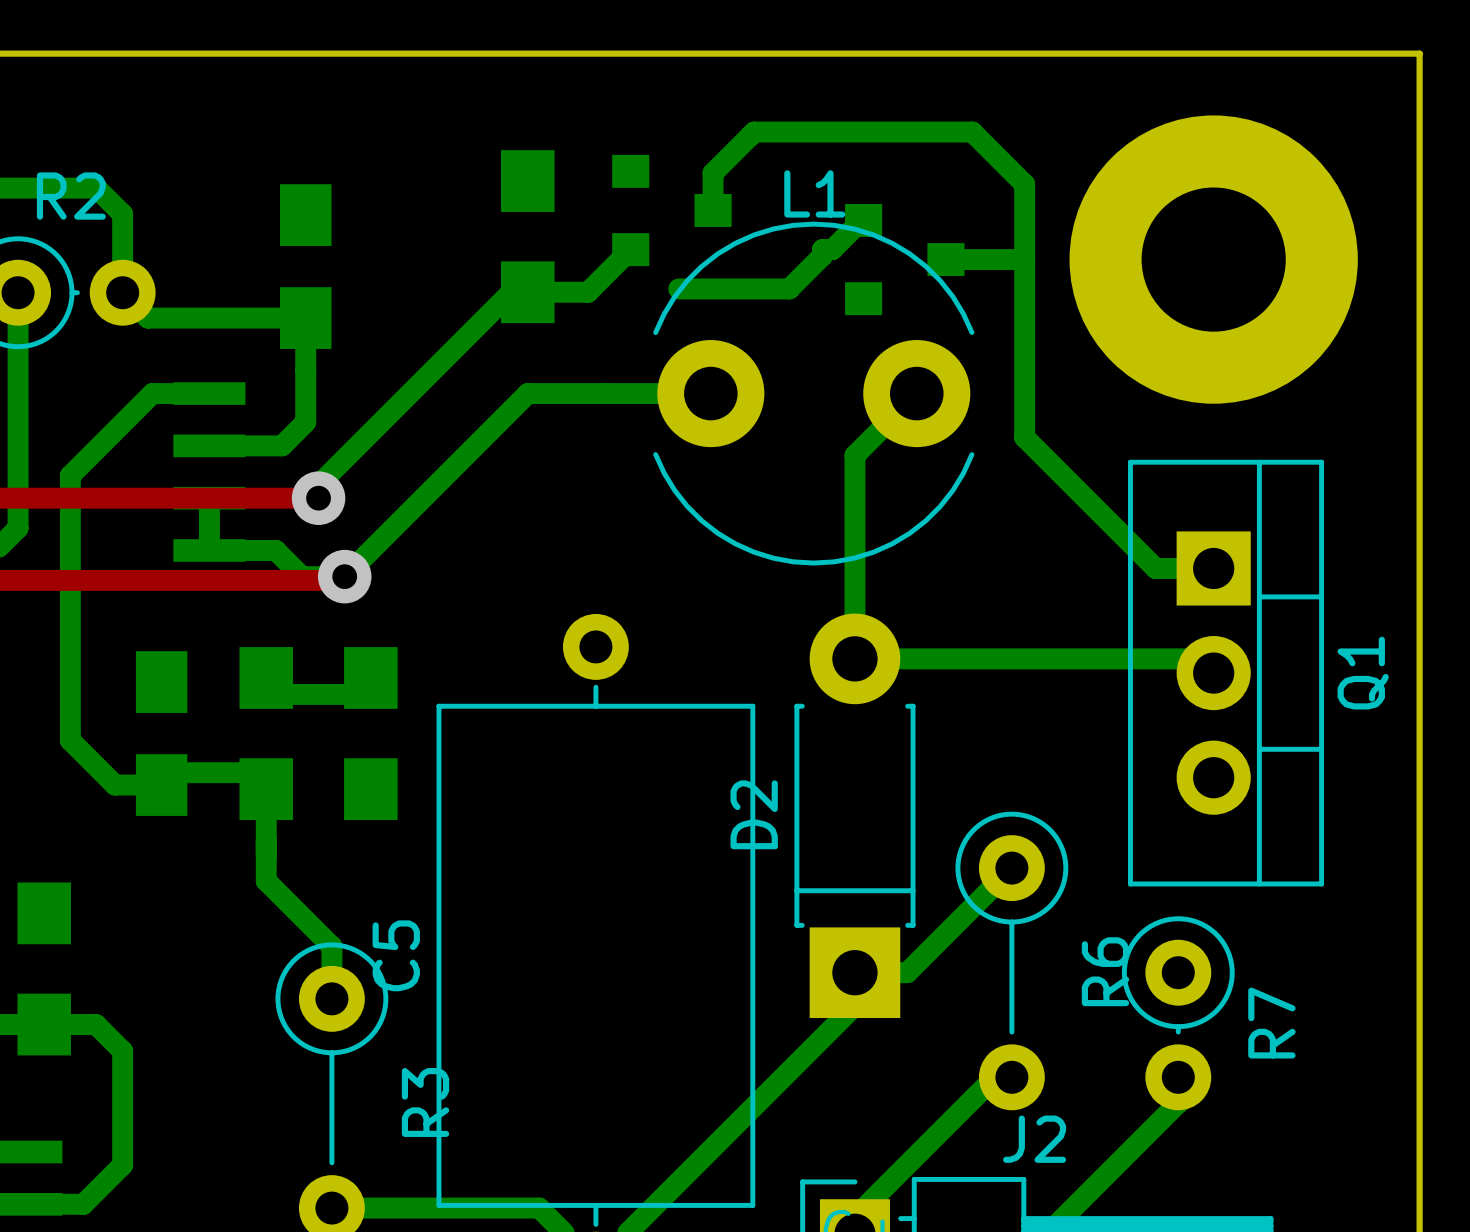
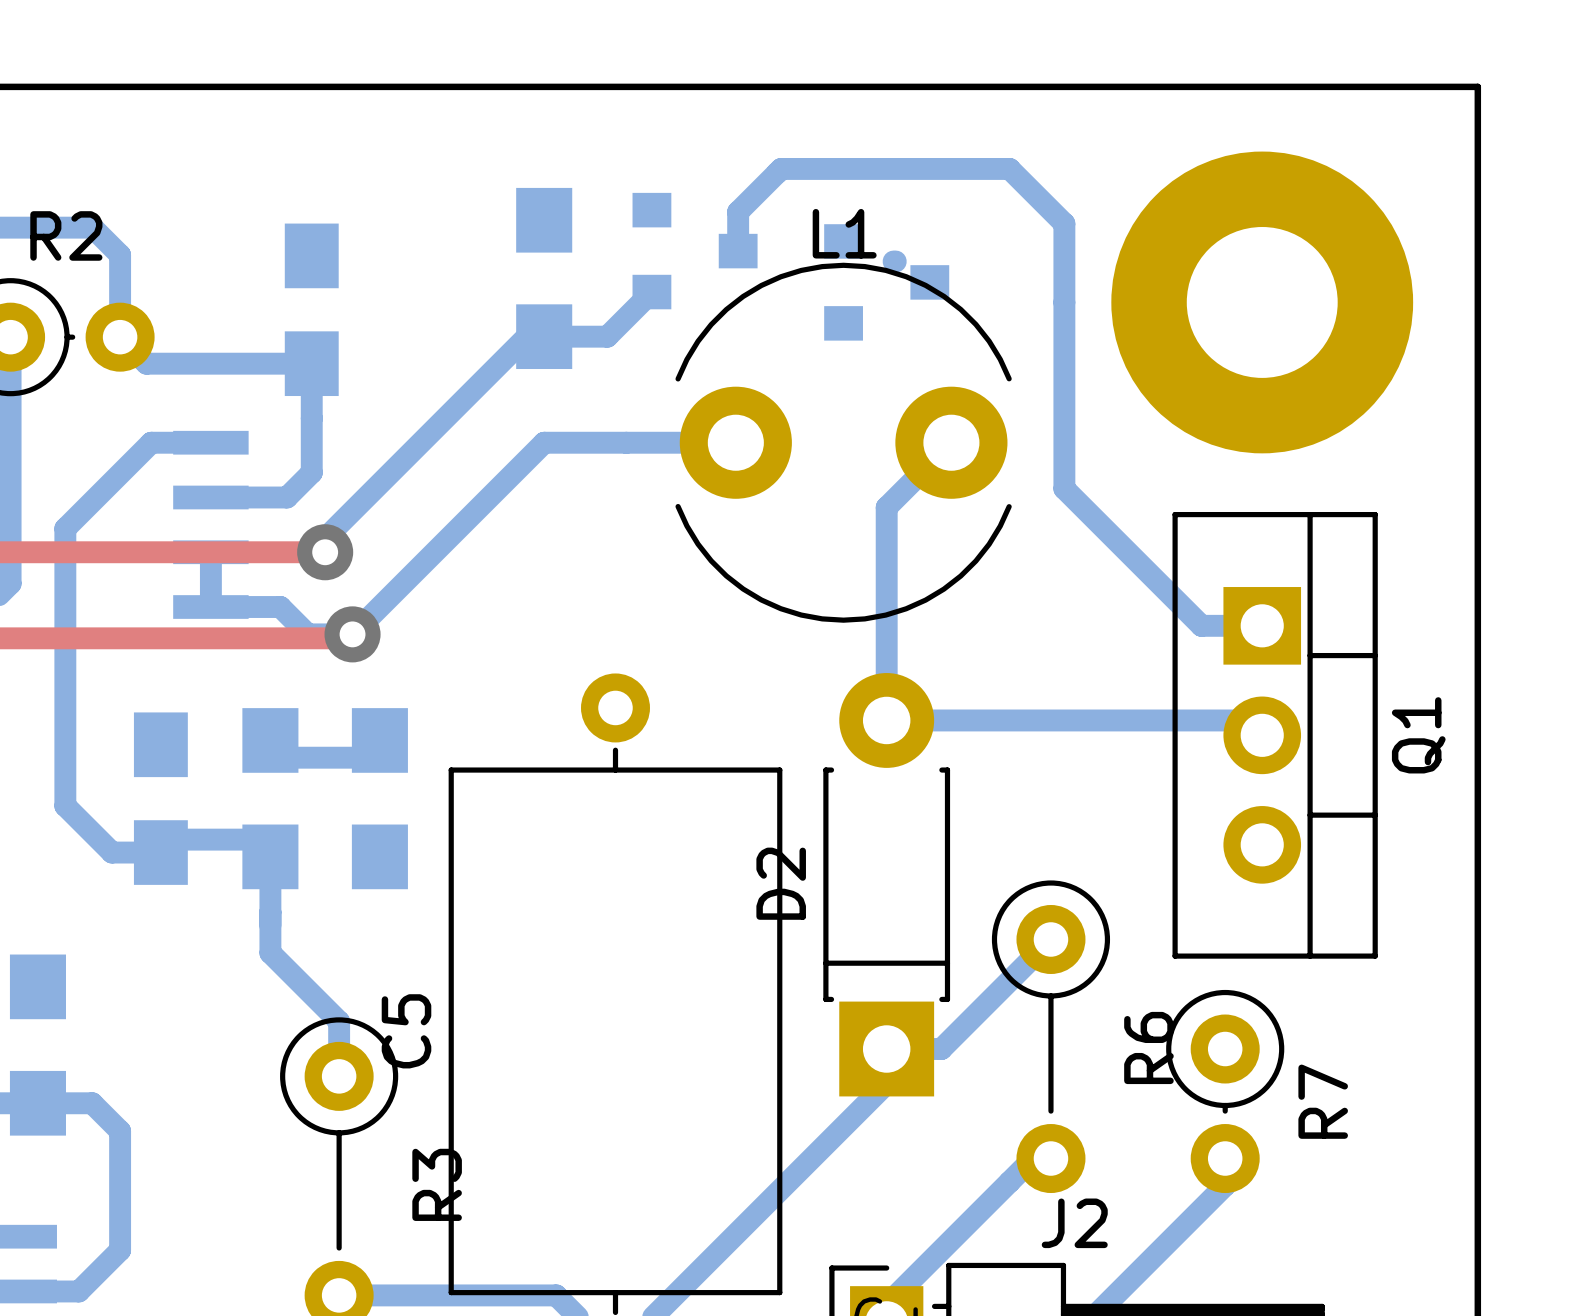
bottom track: (861, 220) (832, 249) (822, 249) (822, 255) (789, 288) (678, 288) -> none
part position: (904, 259) -> (886, 282)
bottom track: (945, 259) (1024, 259) -> none

